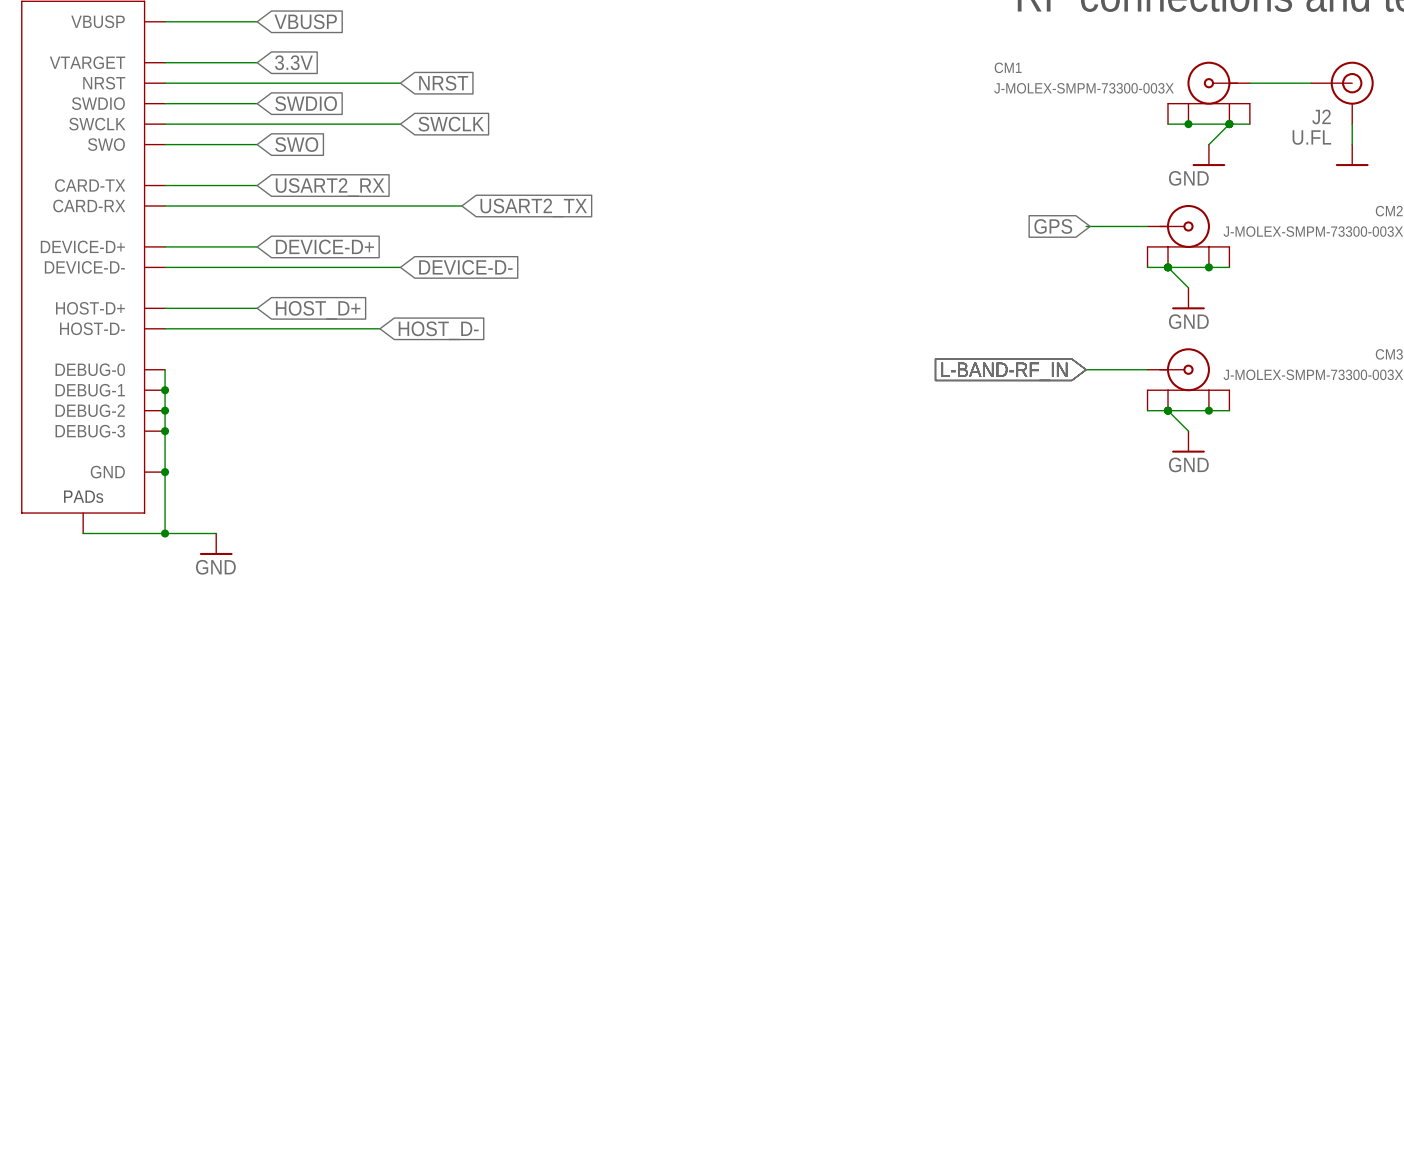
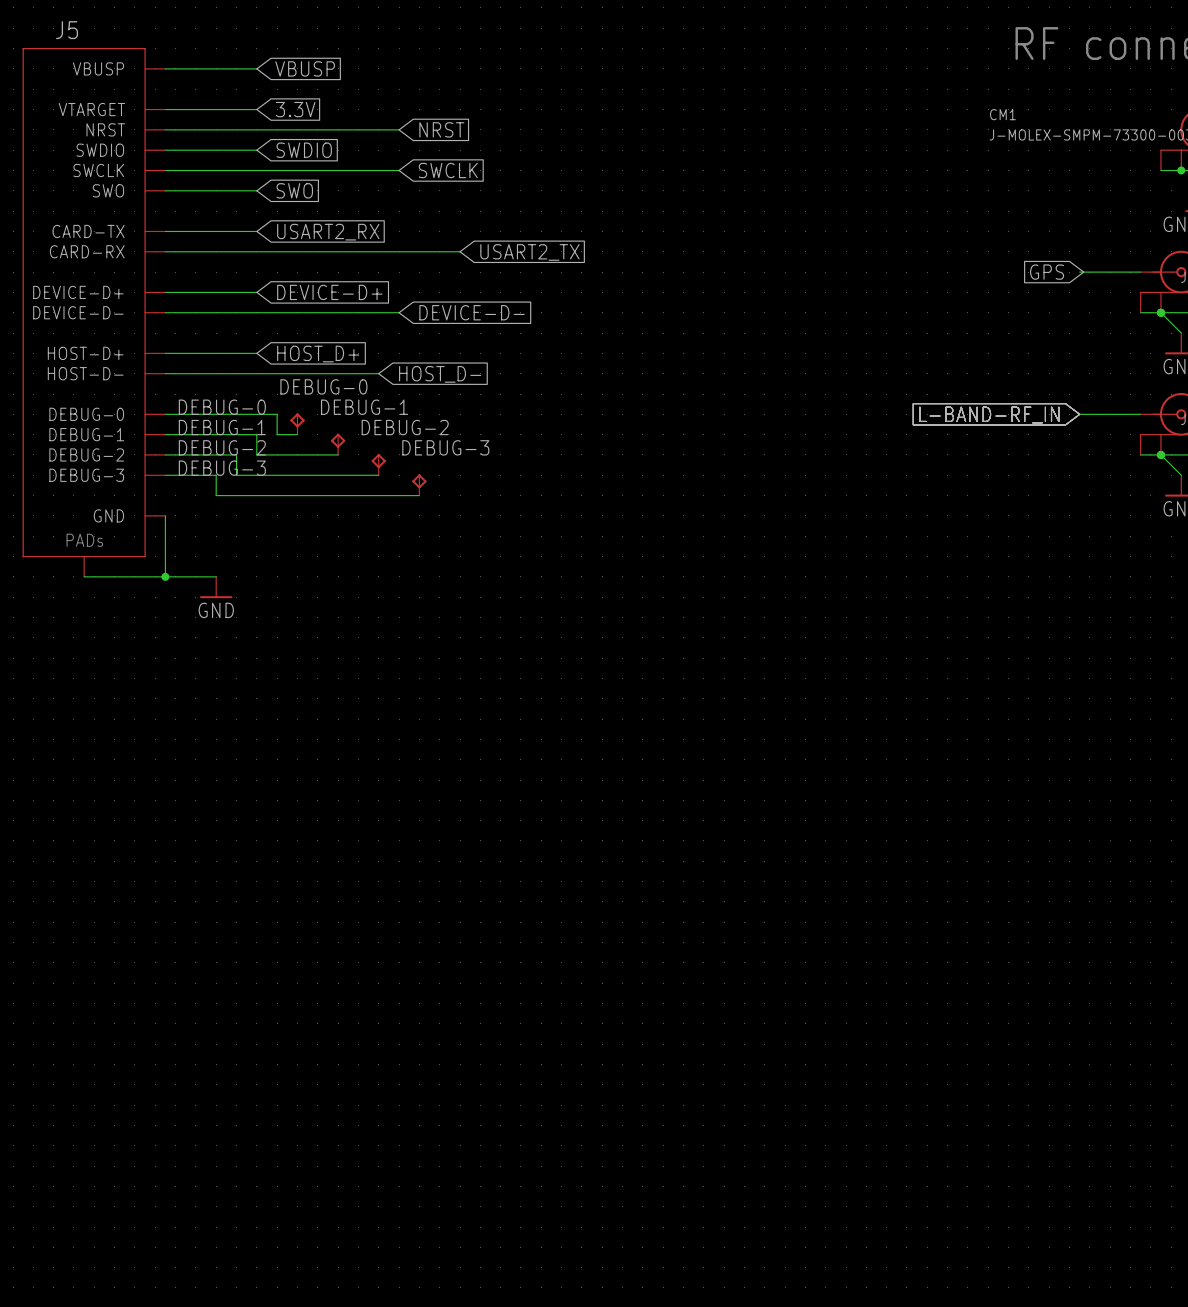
label: none -> DEBUG-0 (222, 407)
wire: (165, 369) (165, 472) -> (165, 414) (277, 414) (277, 434) (297, 434)
DEBUG-0: none -> (297, 423)
label: none -> DEBUG-1 (222, 427)
wire: none -> (165, 434) (256, 434) (256, 454) (338, 454)
junction: (165, 390) -> none
DEBUG-1: none -> (338, 444)
label: none -> DEBUG-2 (222, 447)
wire: none -> (165, 454) (236, 454) (236, 475) (378, 475)
junction: (165, 410) -> none
DEBUG-2: none -> (378, 464)
label: none -> DEBUG-3 (222, 468)
wire: none -> (165, 475) (216, 475) (216, 495) (419, 495)
junction: (165, 431) -> none
DEBUG-3: none -> (419, 484)
junction: (165, 472) -> none

